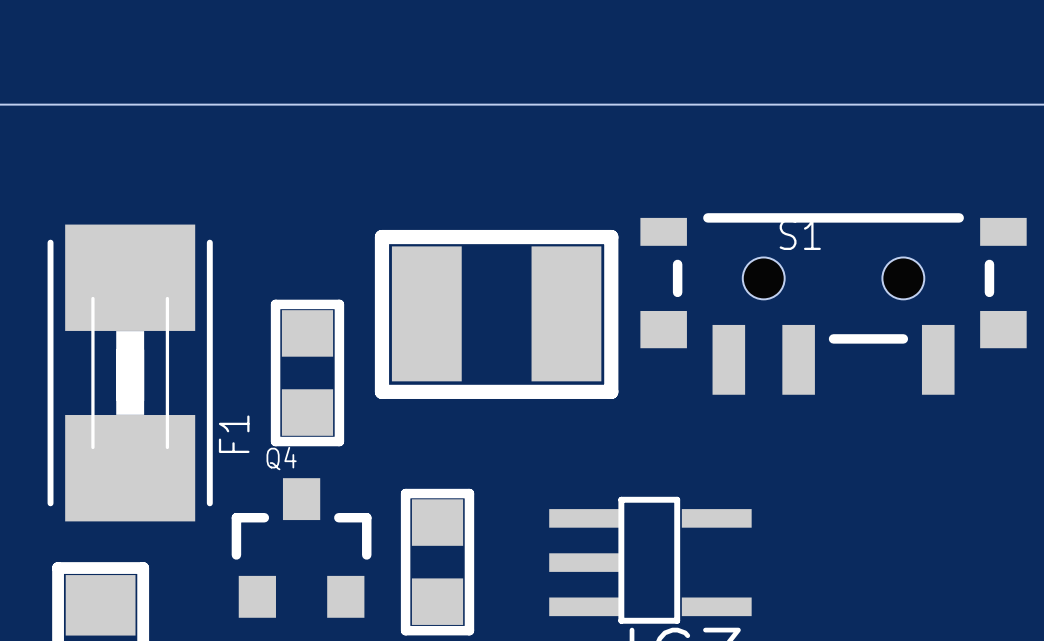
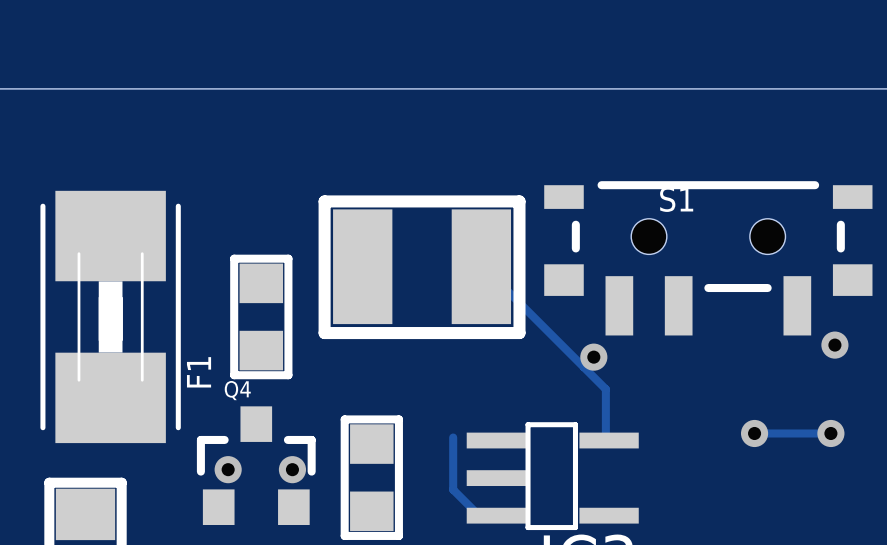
track: none -> (481, 266) (605, 389) (605, 437) (609, 440)
via: none -> (834, 345)
via: none -> (593, 357)
track: none -> (754, 433) (830, 433)
via: none -> (754, 433)
via: none -> (830, 433)
track: none -> (453, 437) (453, 489) (477, 513) (493, 513) (496, 515)
via: none -> (228, 469)
via: none -> (292, 469)

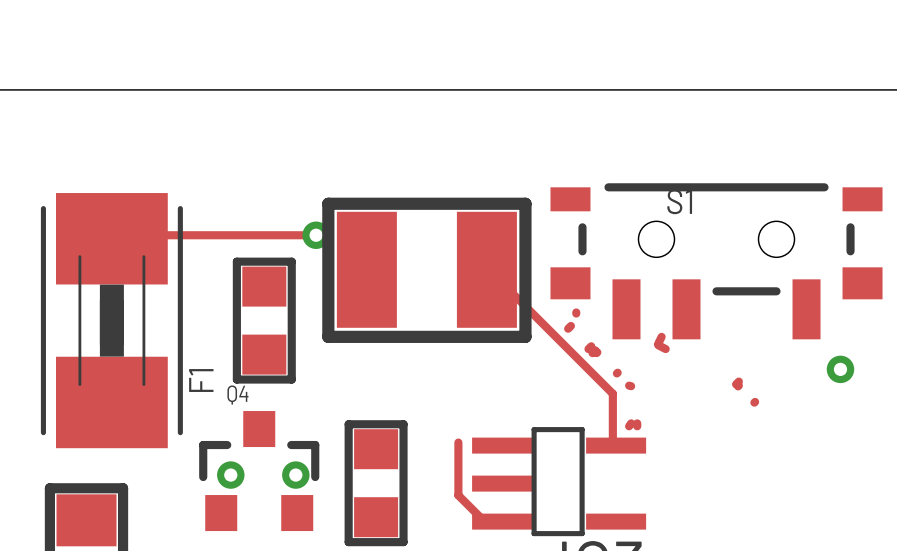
track: none -> (316, 235) (112, 235) (111, 238)
via: none -> (316, 235)
track: none -> (576, 312) (576, 313)
track: none -> (570, 325) (568, 328)
track: none -> (661, 336) (658, 343)
track: none -> (658, 345) (665, 349)
track: none -> (591, 346) (588, 349)
via position: (834, 345) -> (840, 369)
track: none -> (595, 350) (592, 353)
track: none -> (597, 352) (596, 353)
via: (593, 357) -> none
track: none -> (617, 372) (616, 373)
track: none -> (738, 381) (736, 384)
track: none -> (629, 385) (631, 386)
track: none -> (738, 385) (738, 386)
track: none -> (755, 401) (754, 402)
track: none -> (631, 423) (629, 426)
track: none -> (637, 423) (637, 426)
track: (754, 433) (830, 433) -> none
via: (754, 433) -> none
via: (830, 433) -> none

